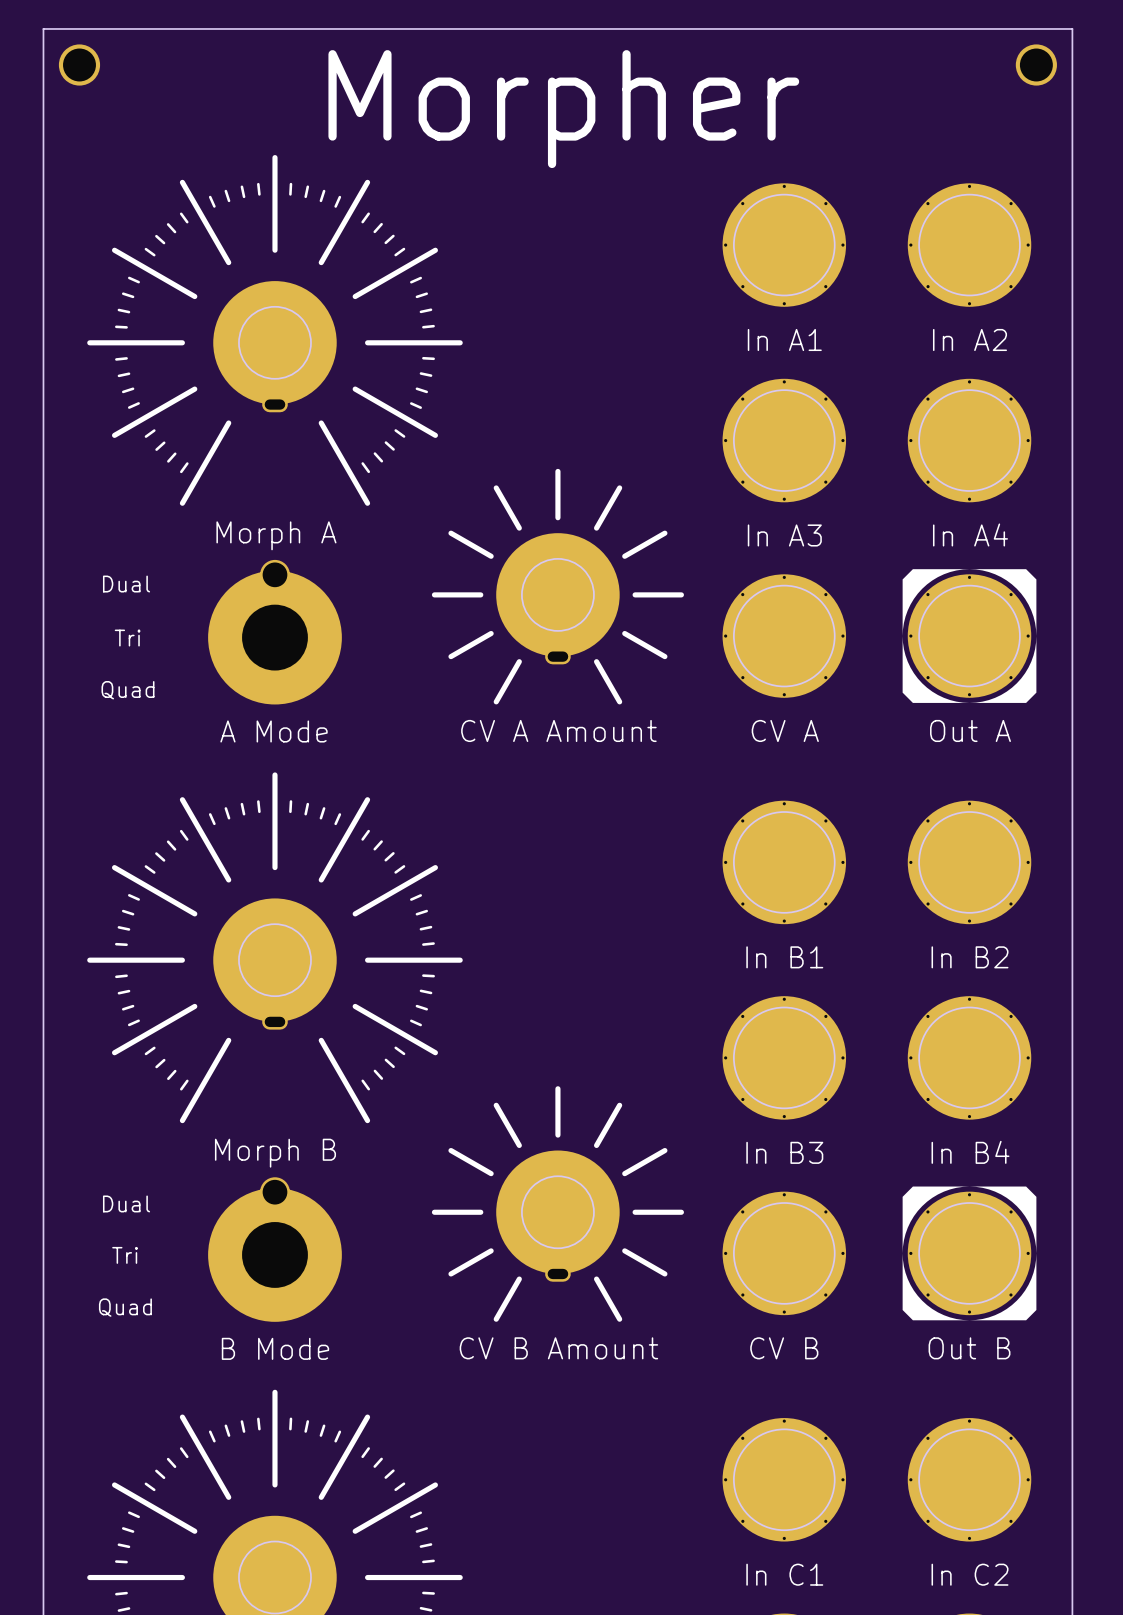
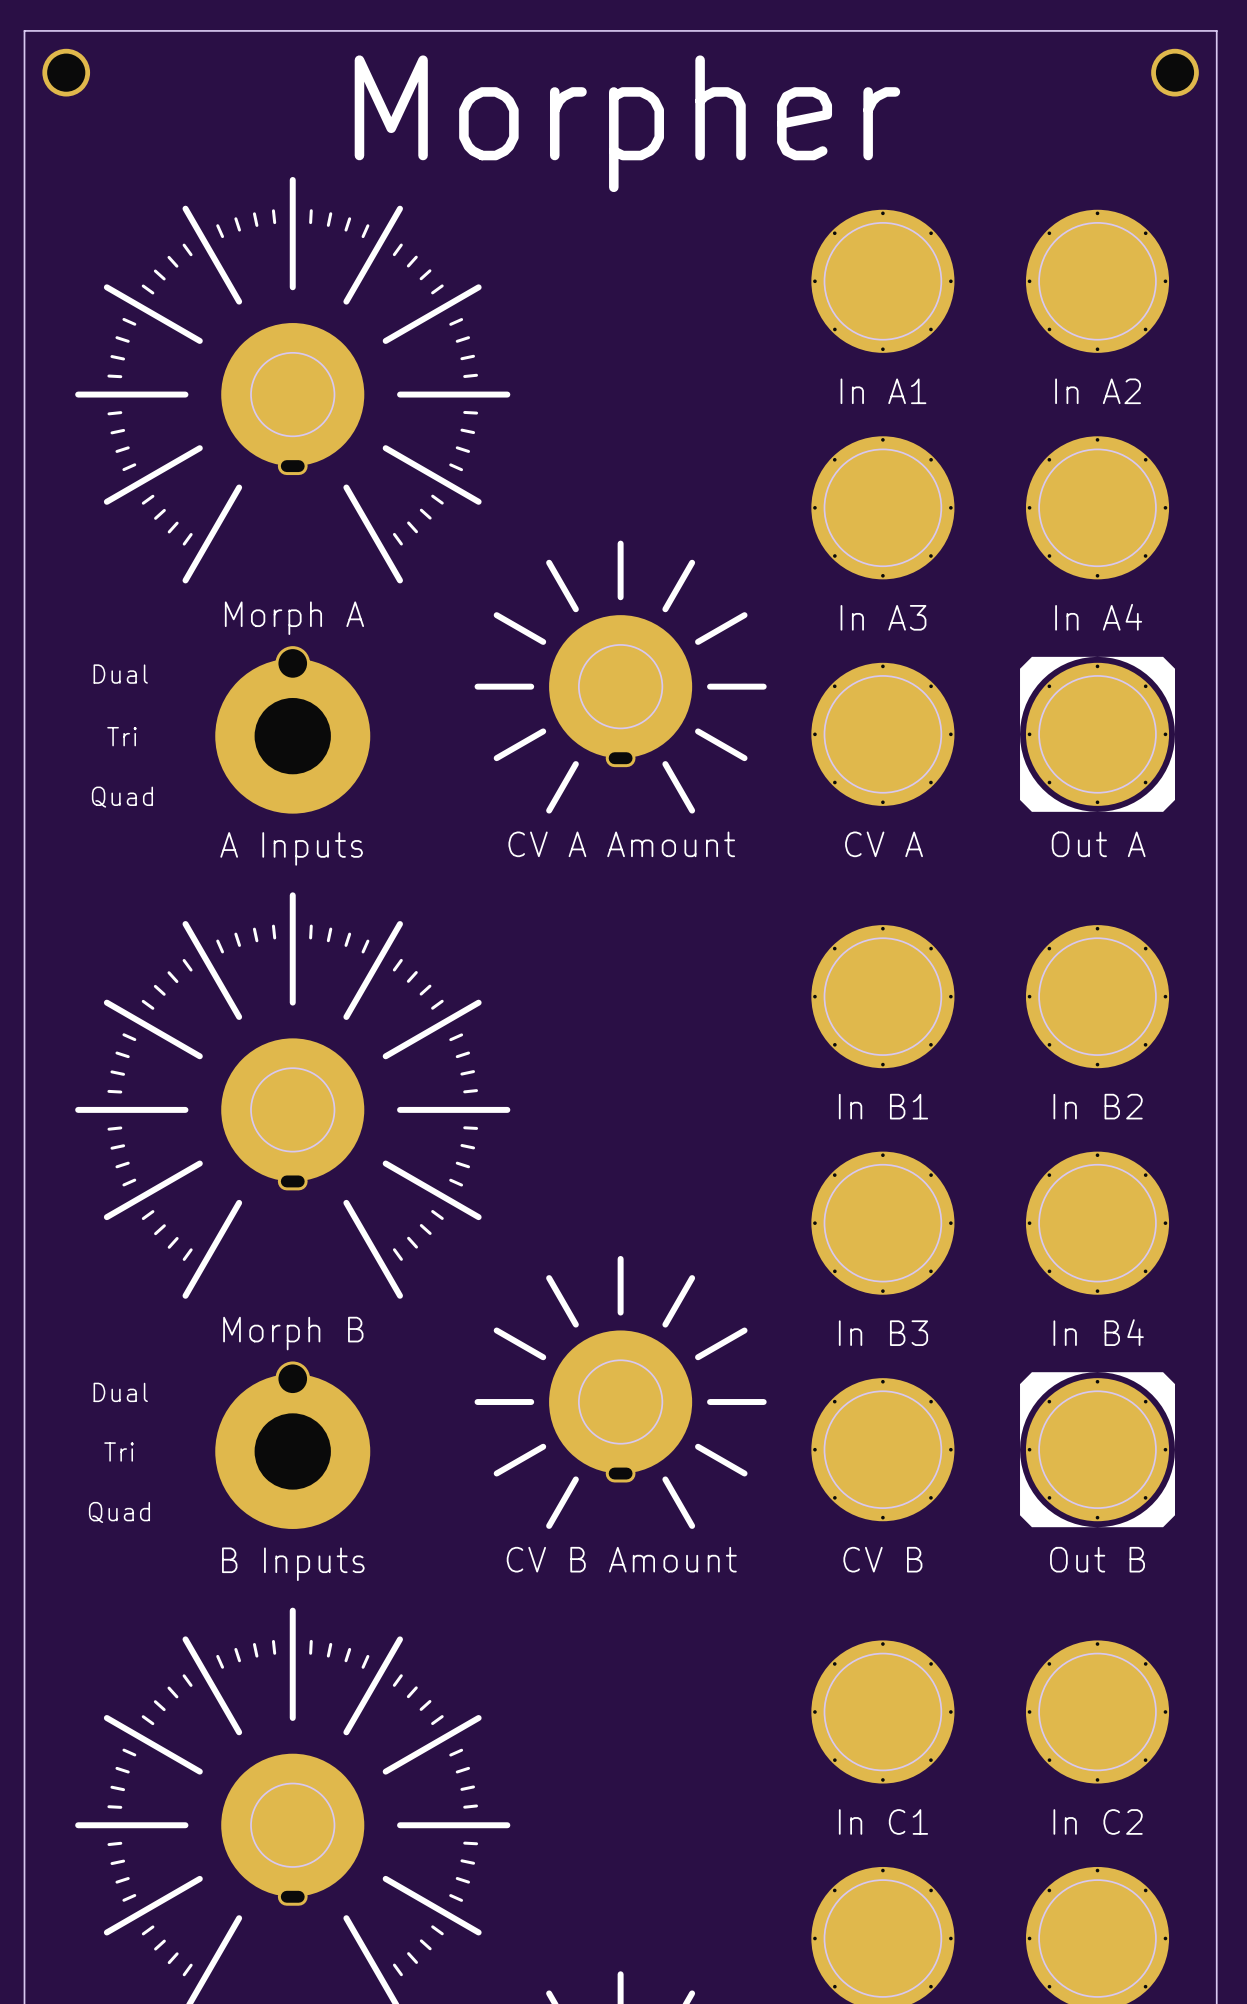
part value: A Mode (274, 731) -> A Inputs (291, 848)
part value: B Mode (275, 1348) -> B Inputs (293, 1564)

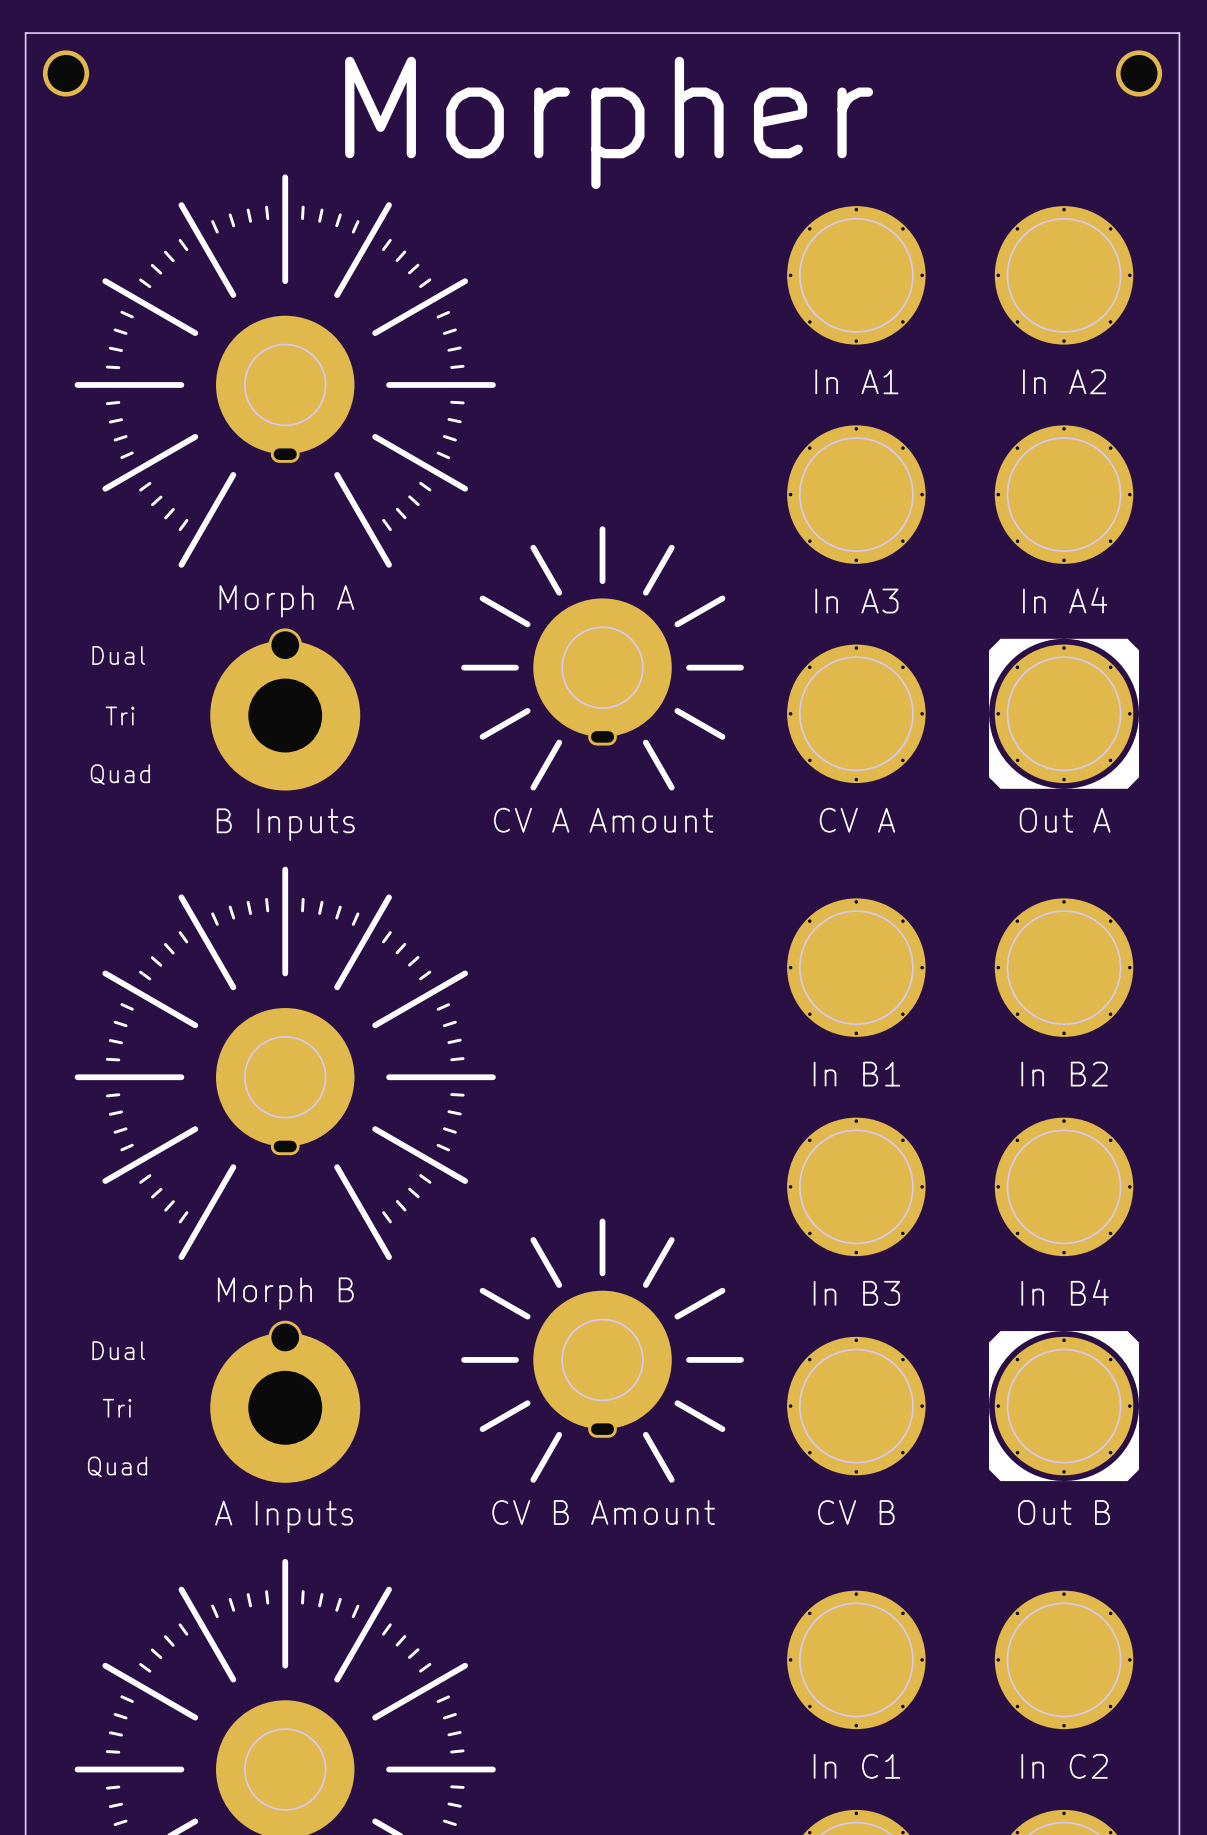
part value: A Inputs (291, 848) -> B Inputs (285, 824)
part value: B Inputs (293, 1564) -> A Inputs (284, 1516)

